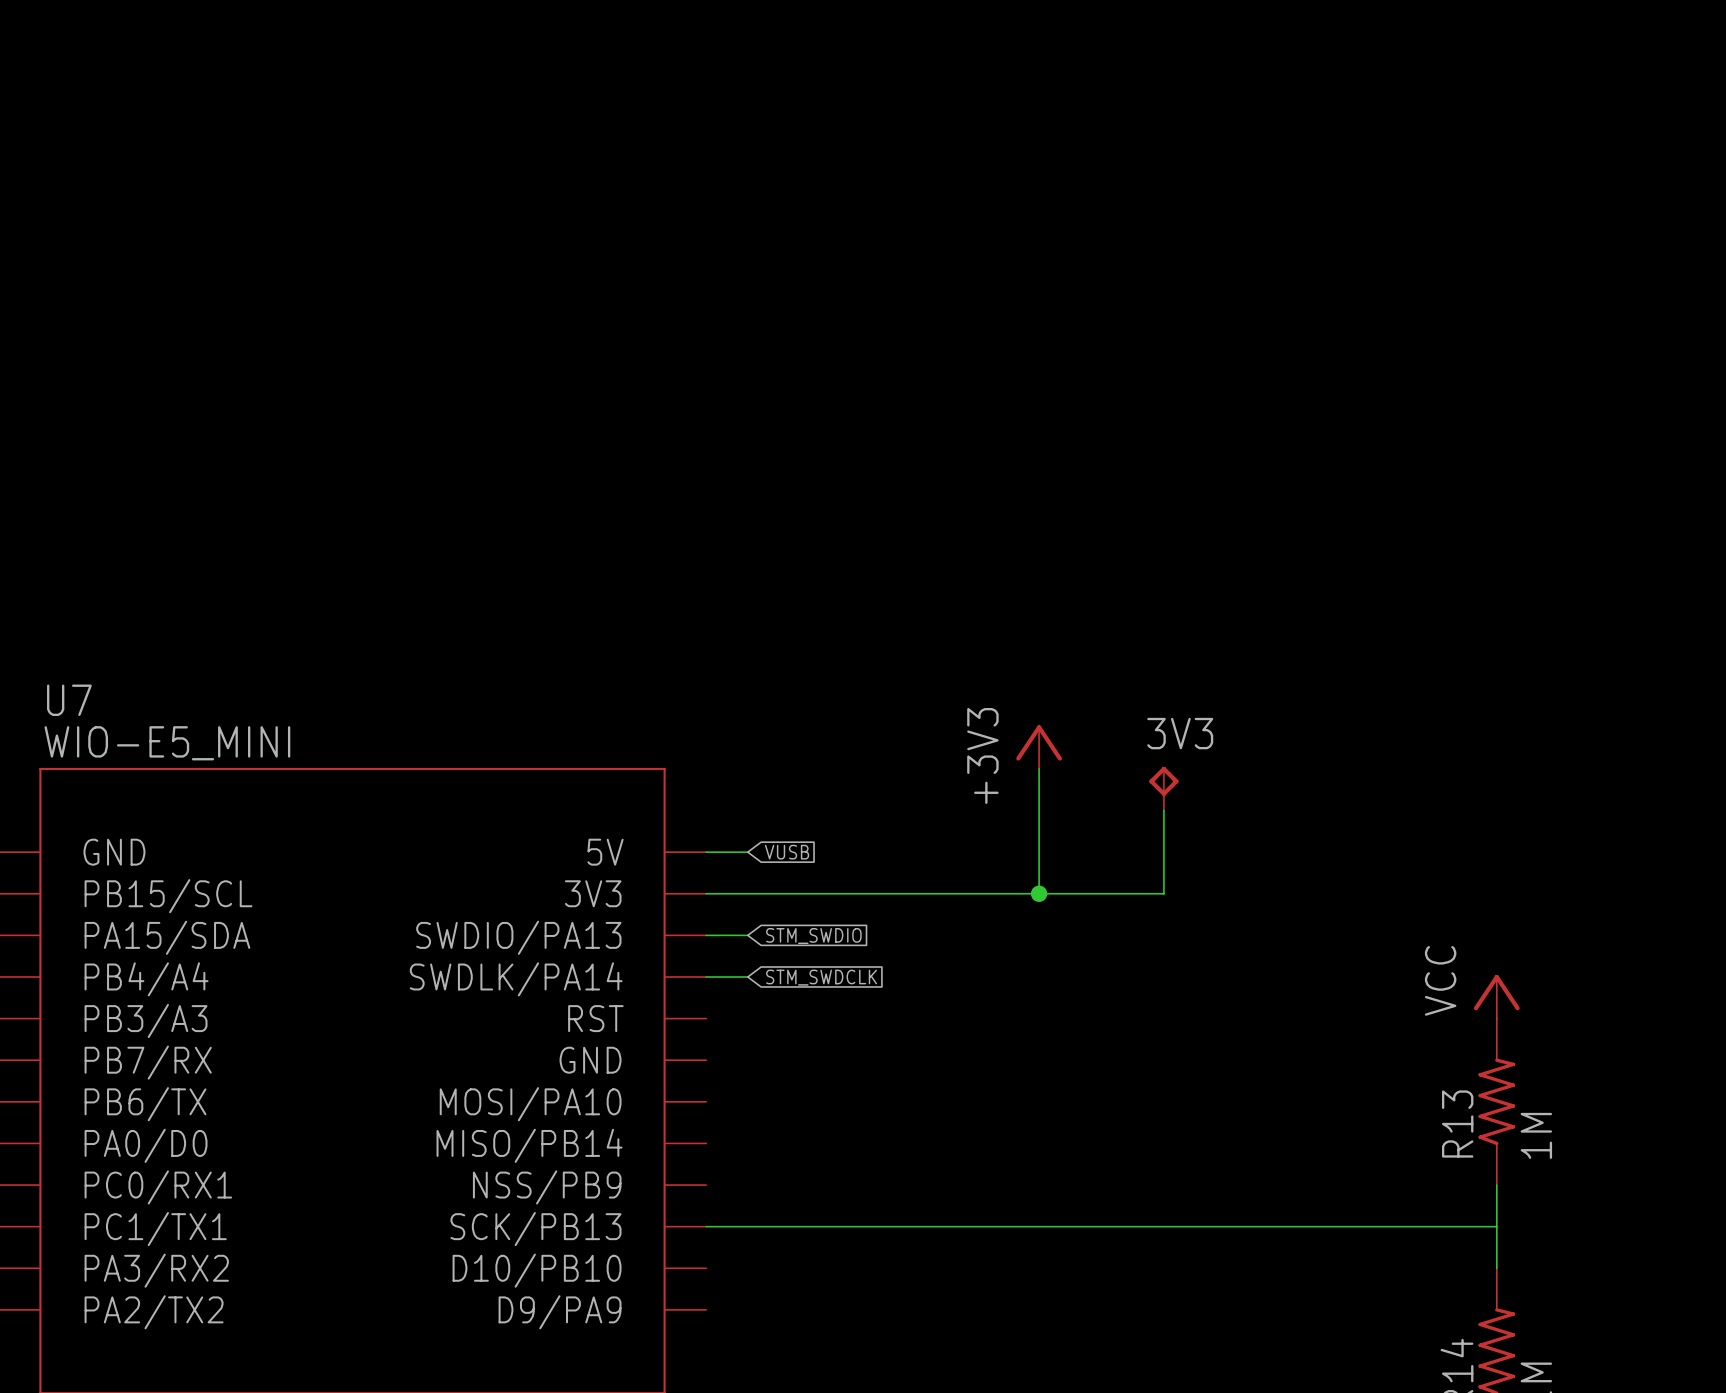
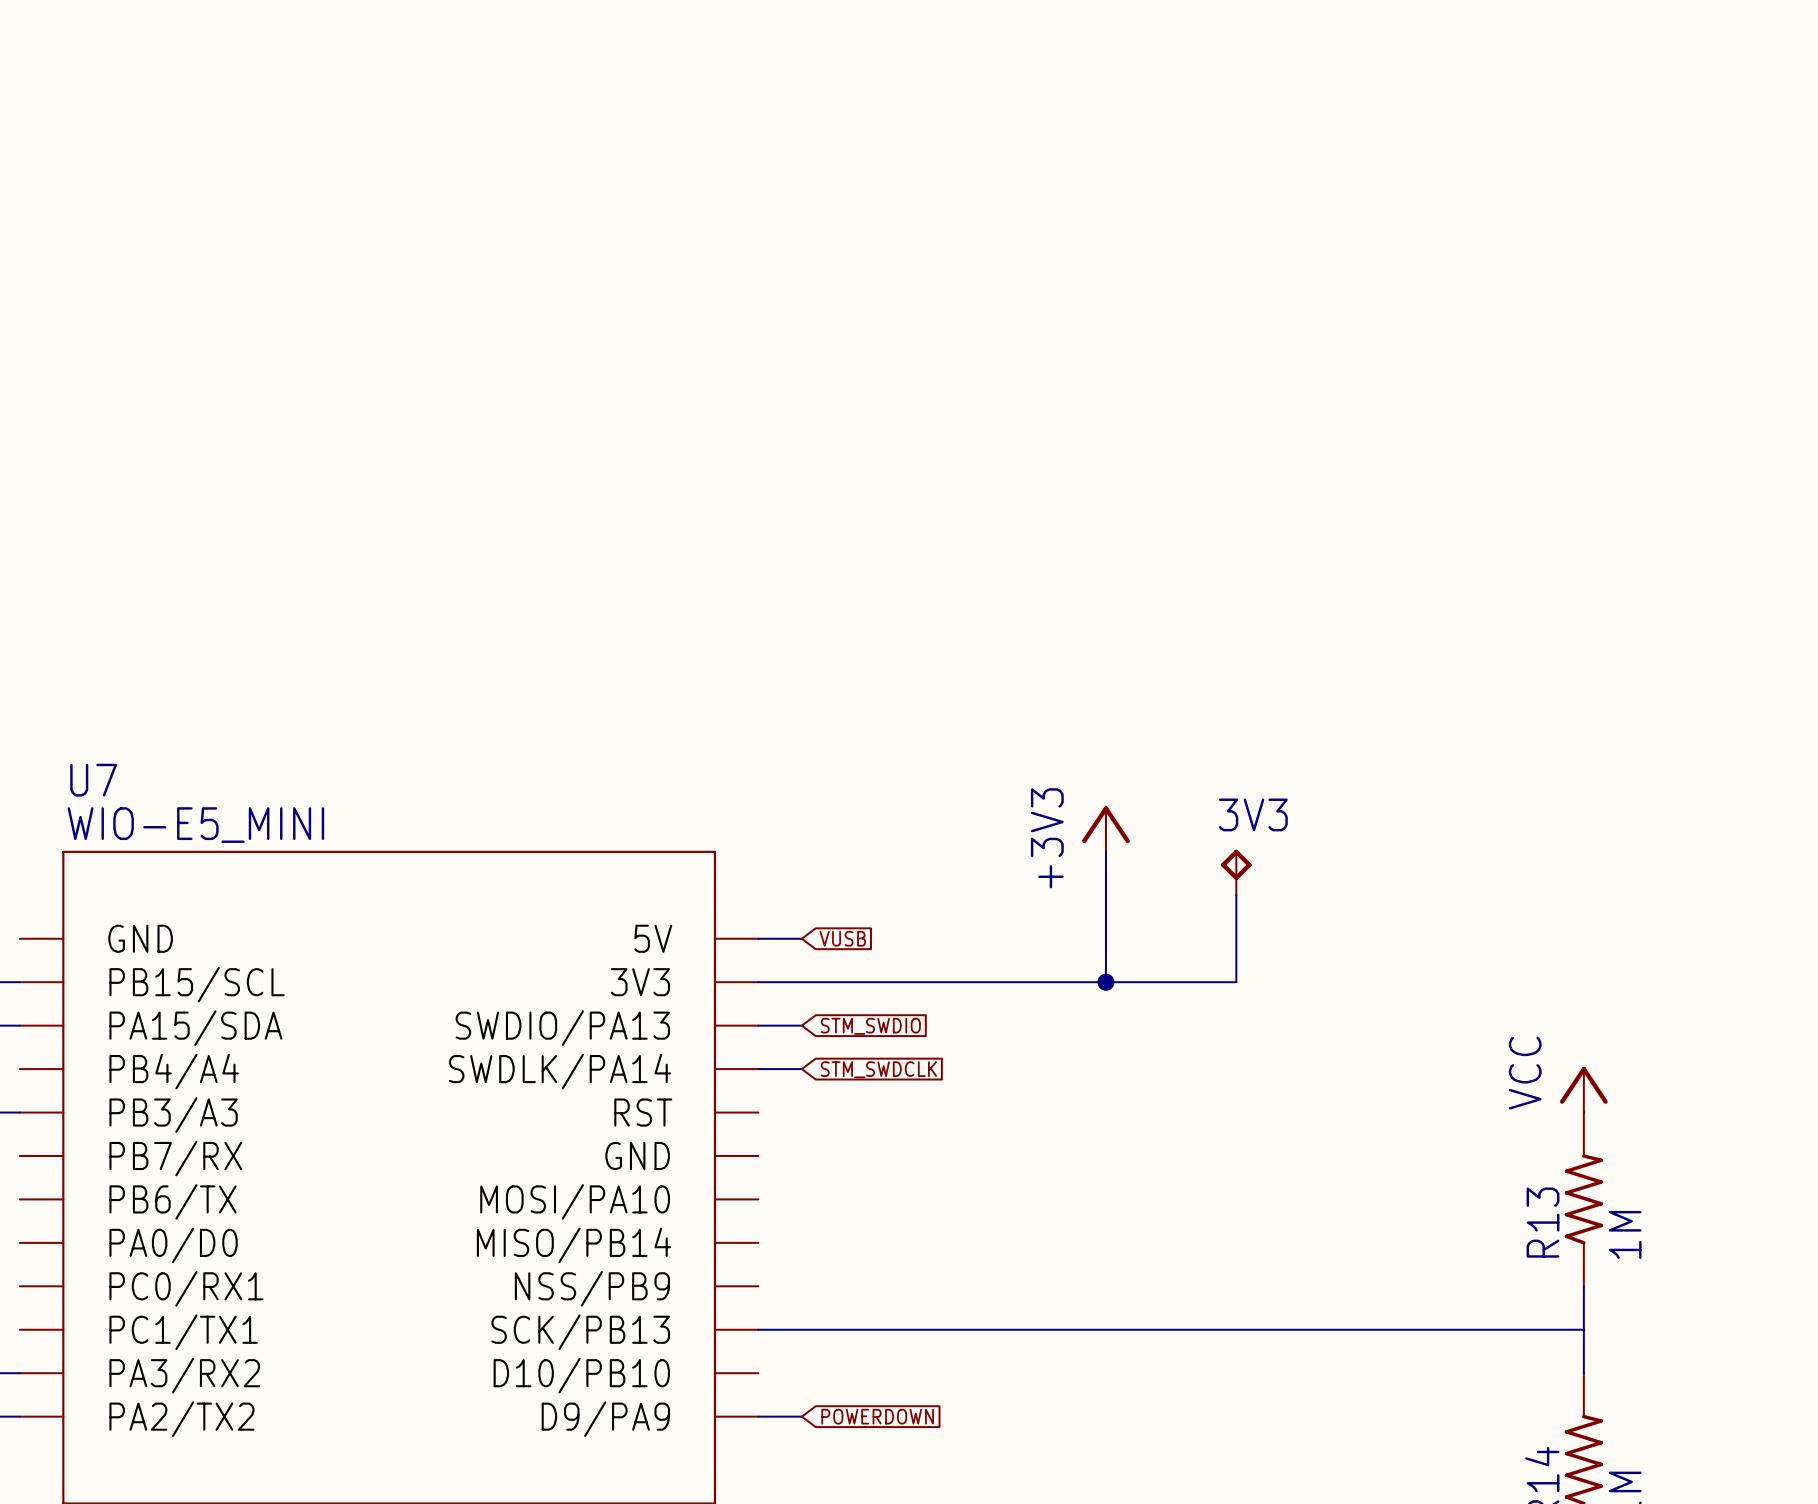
wire: none -> (758, 1416) (801, 1416)
global label: none -> POWERDOWN (877, 1416)

